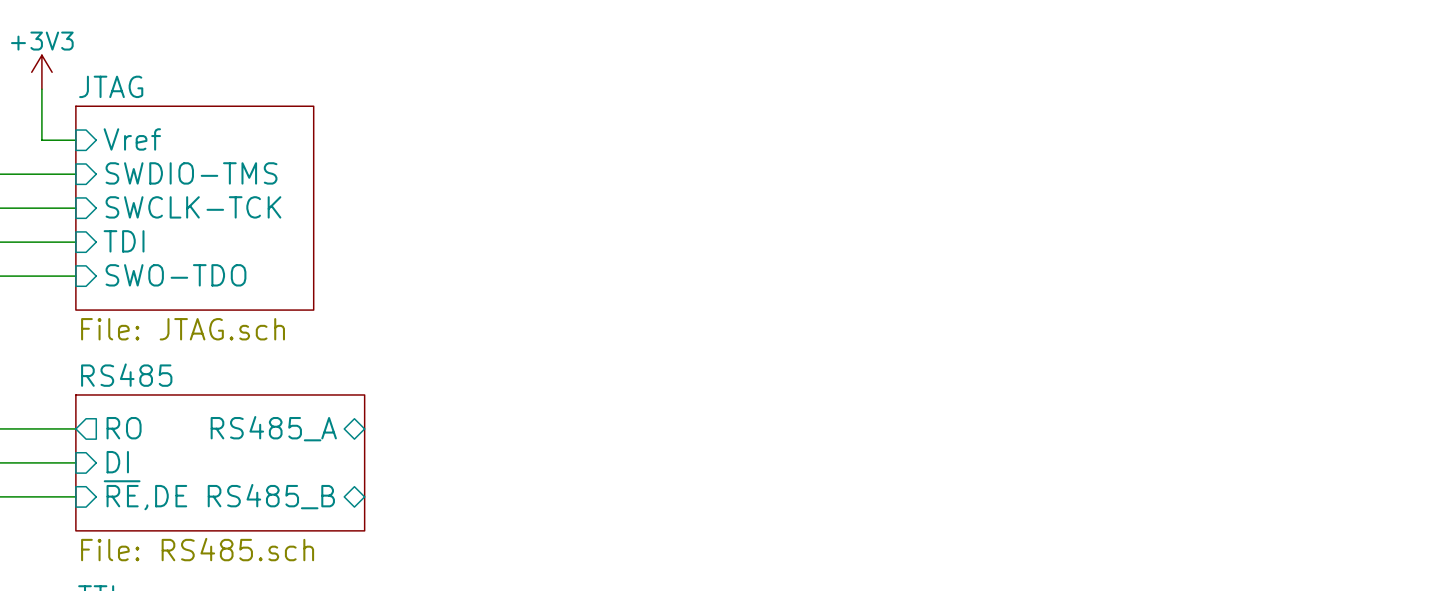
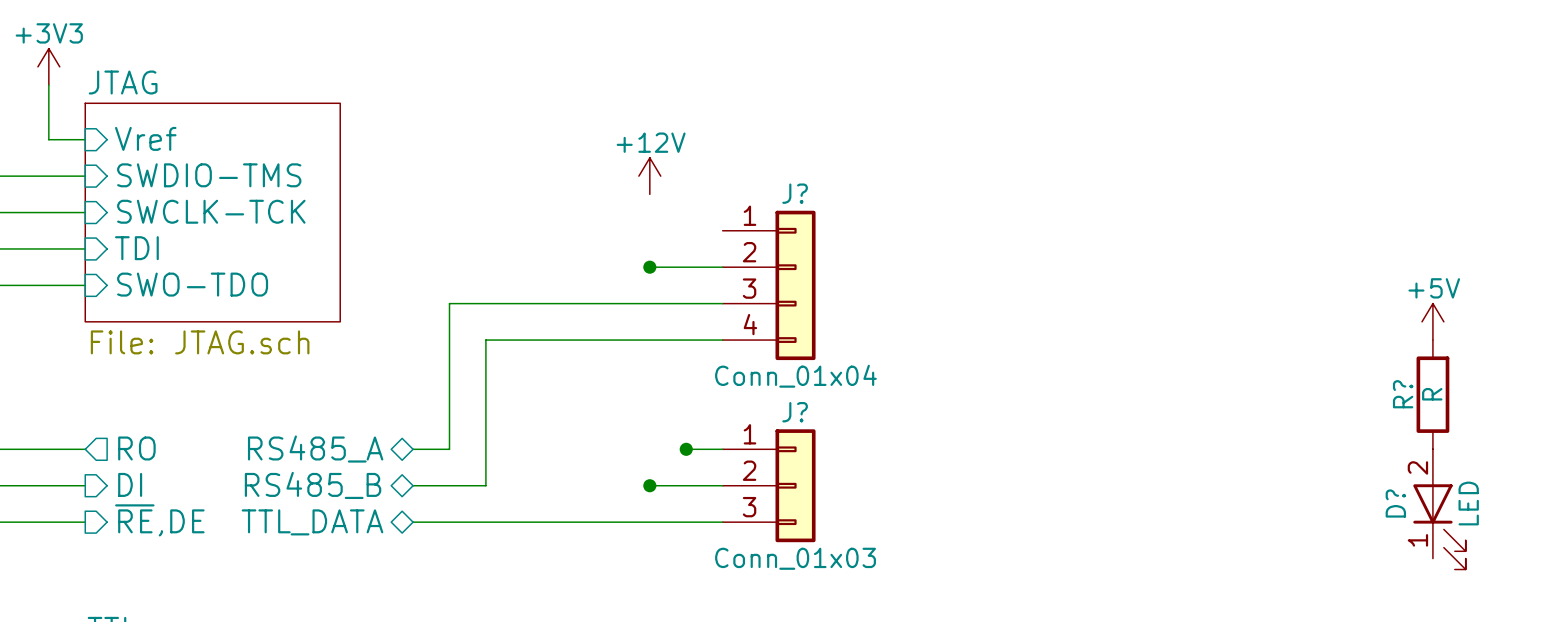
power symbol: none -> +12V (649, 176)
wire: none -> (649, 267) (722, 267)
junction: none -> (649, 267)
J?: none -> Conn_01x04 (769, 285)
wire: none -> (722, 303) (449, 303) (449, 449) (413, 449)
power symbol: none -> +5V (1432, 321)
wire: none -> (722, 340) (485, 340) (485, 485) (413, 485)
R?: none -> R (1432, 394)
sheet pin position: RS485_A (273, 428) -> RS485_A (315, 449)
wire: none -> (686, 449) (722, 449)
junction: none -> (686, 449)
sheet RS485: File: RS485.sch (220, 462) -> none
wire: none -> (649, 485) (722, 485)
junction: none -> (649, 485)
J?: none -> Conn_01x03 (769, 485)
D?: none -> LED (1439, 509)
sheet pin position: RS485_B (271, 496) -> RS485_B (313, 485)
wire: none -> (413, 522) (722, 522)
sheet pin: none -> TTL_DATA (312, 522)

